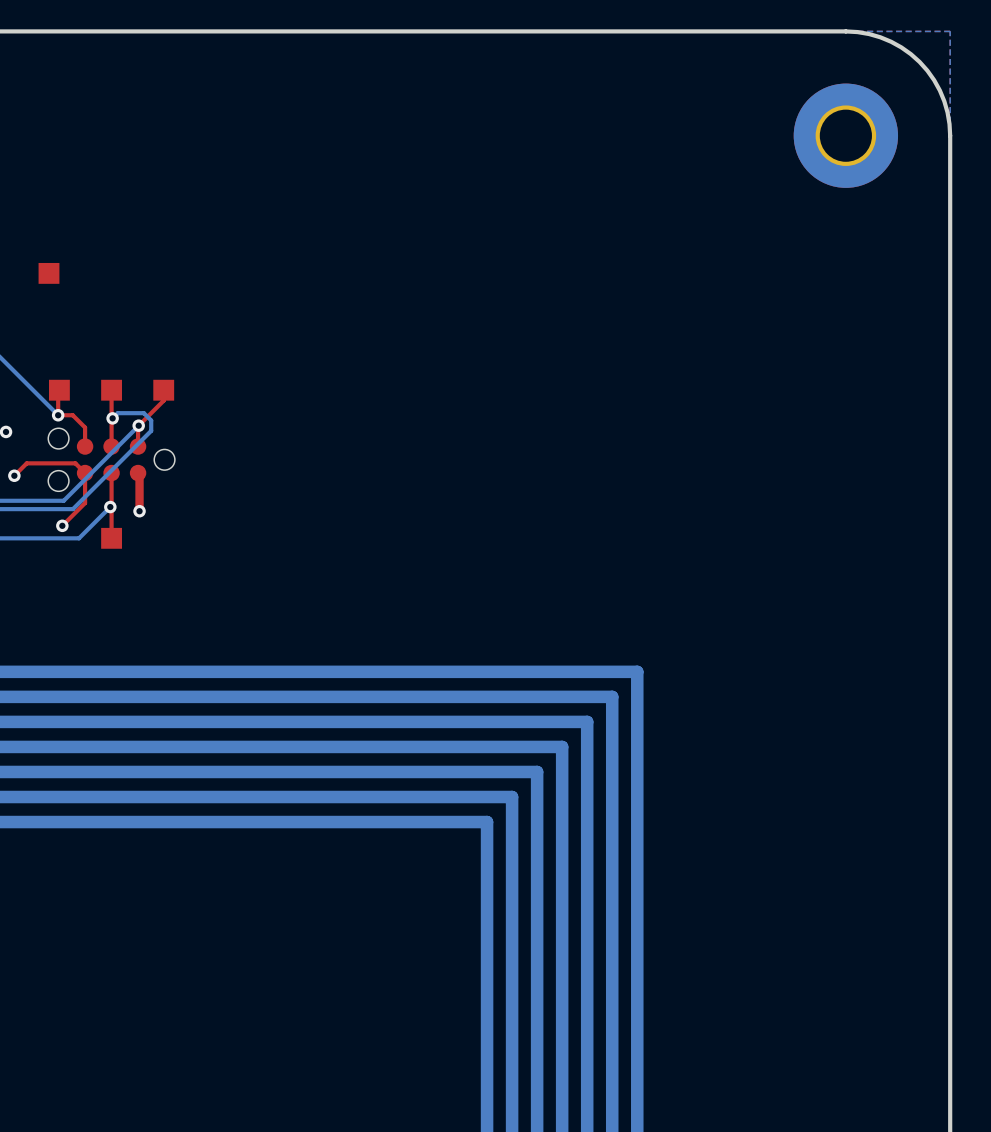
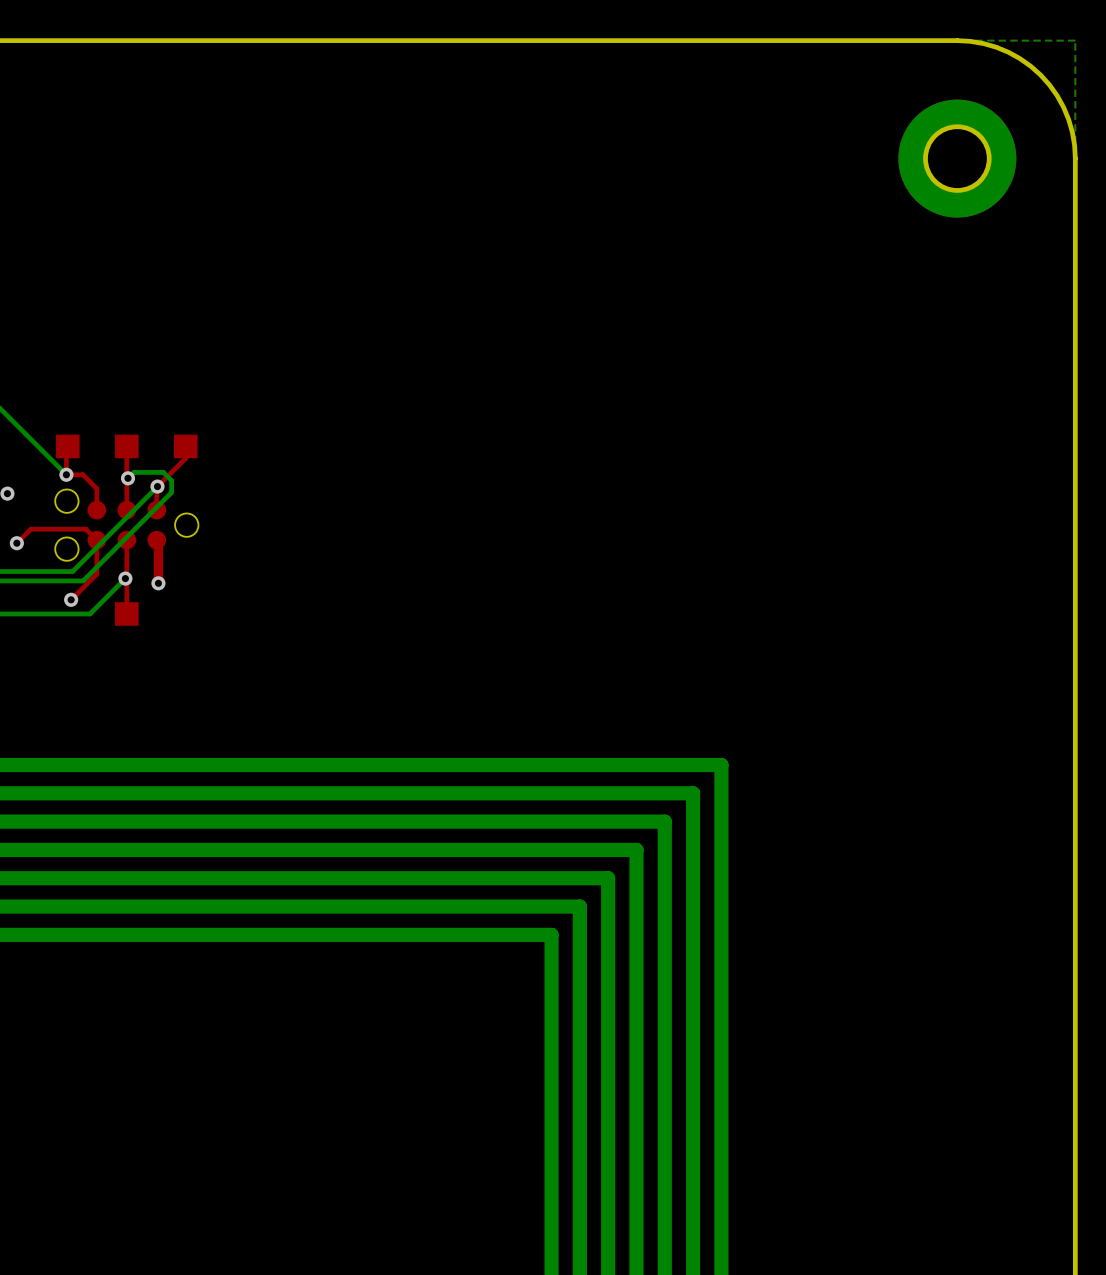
part: (48, 273) -> none

